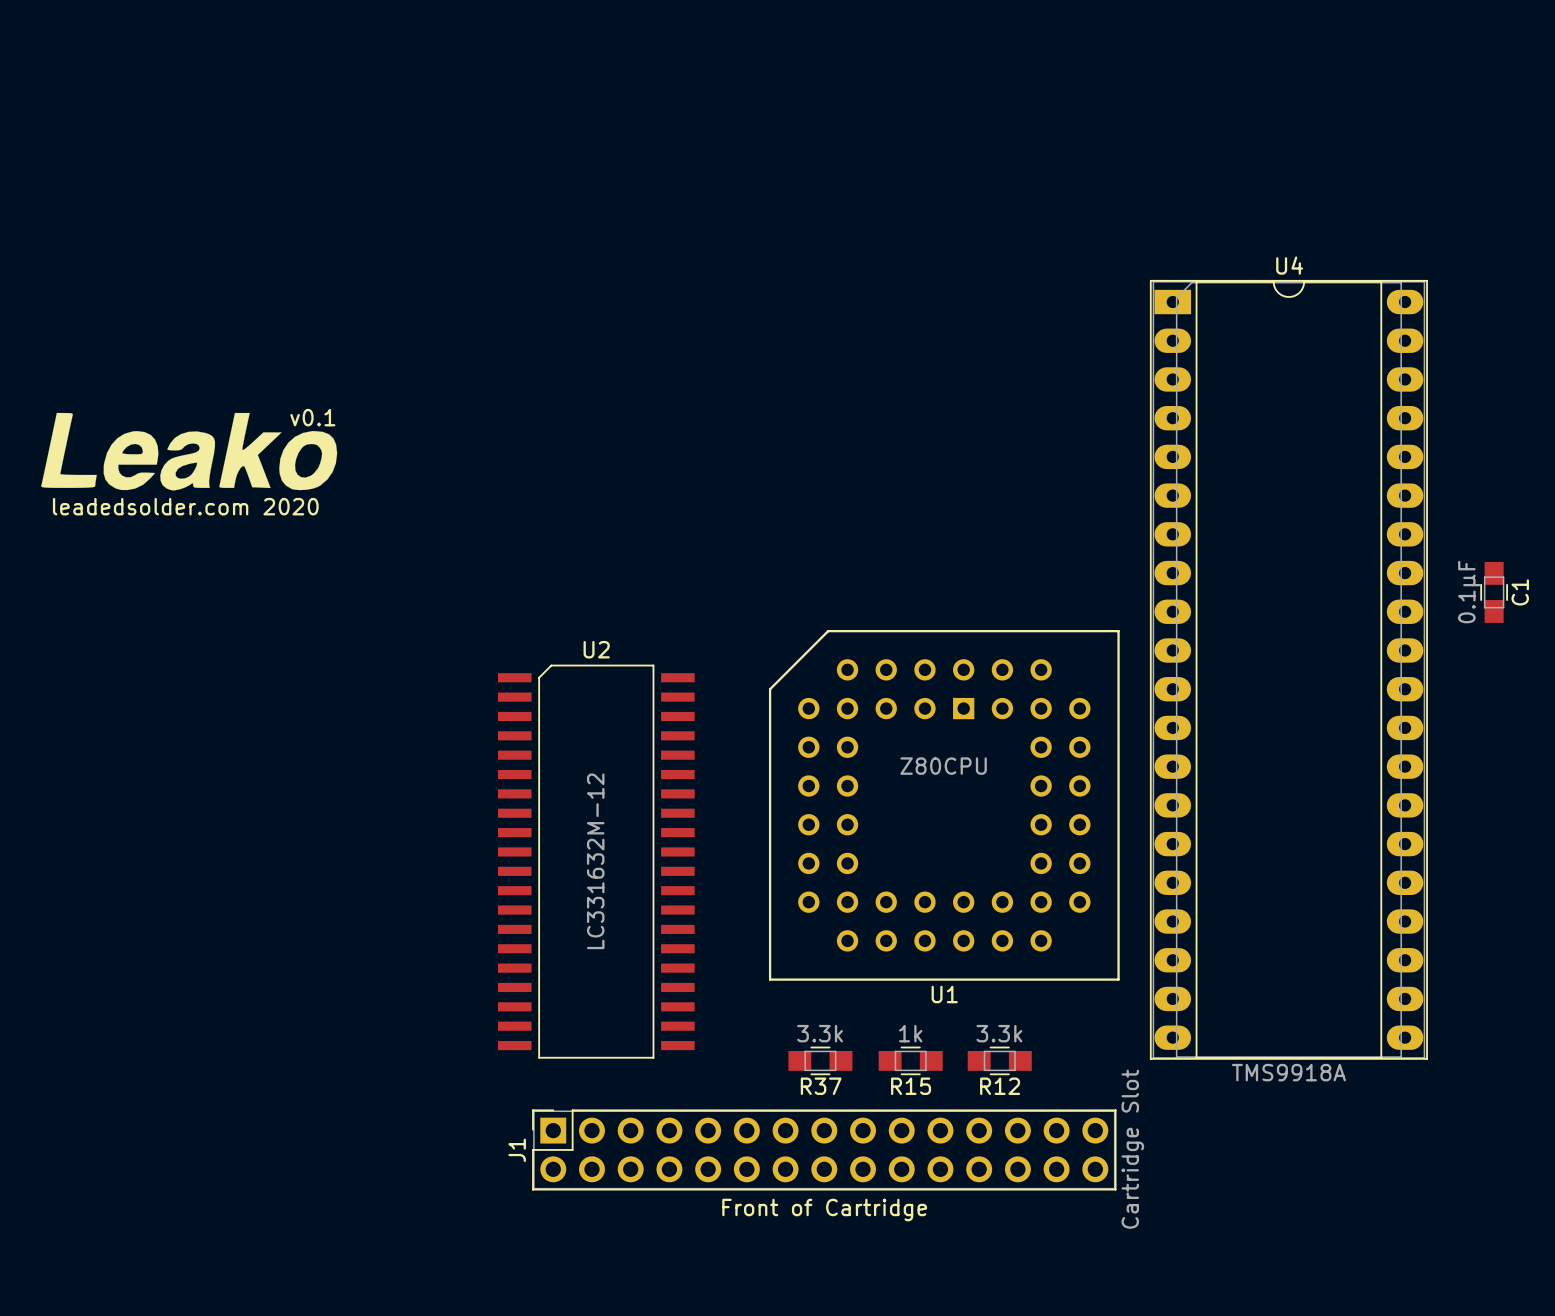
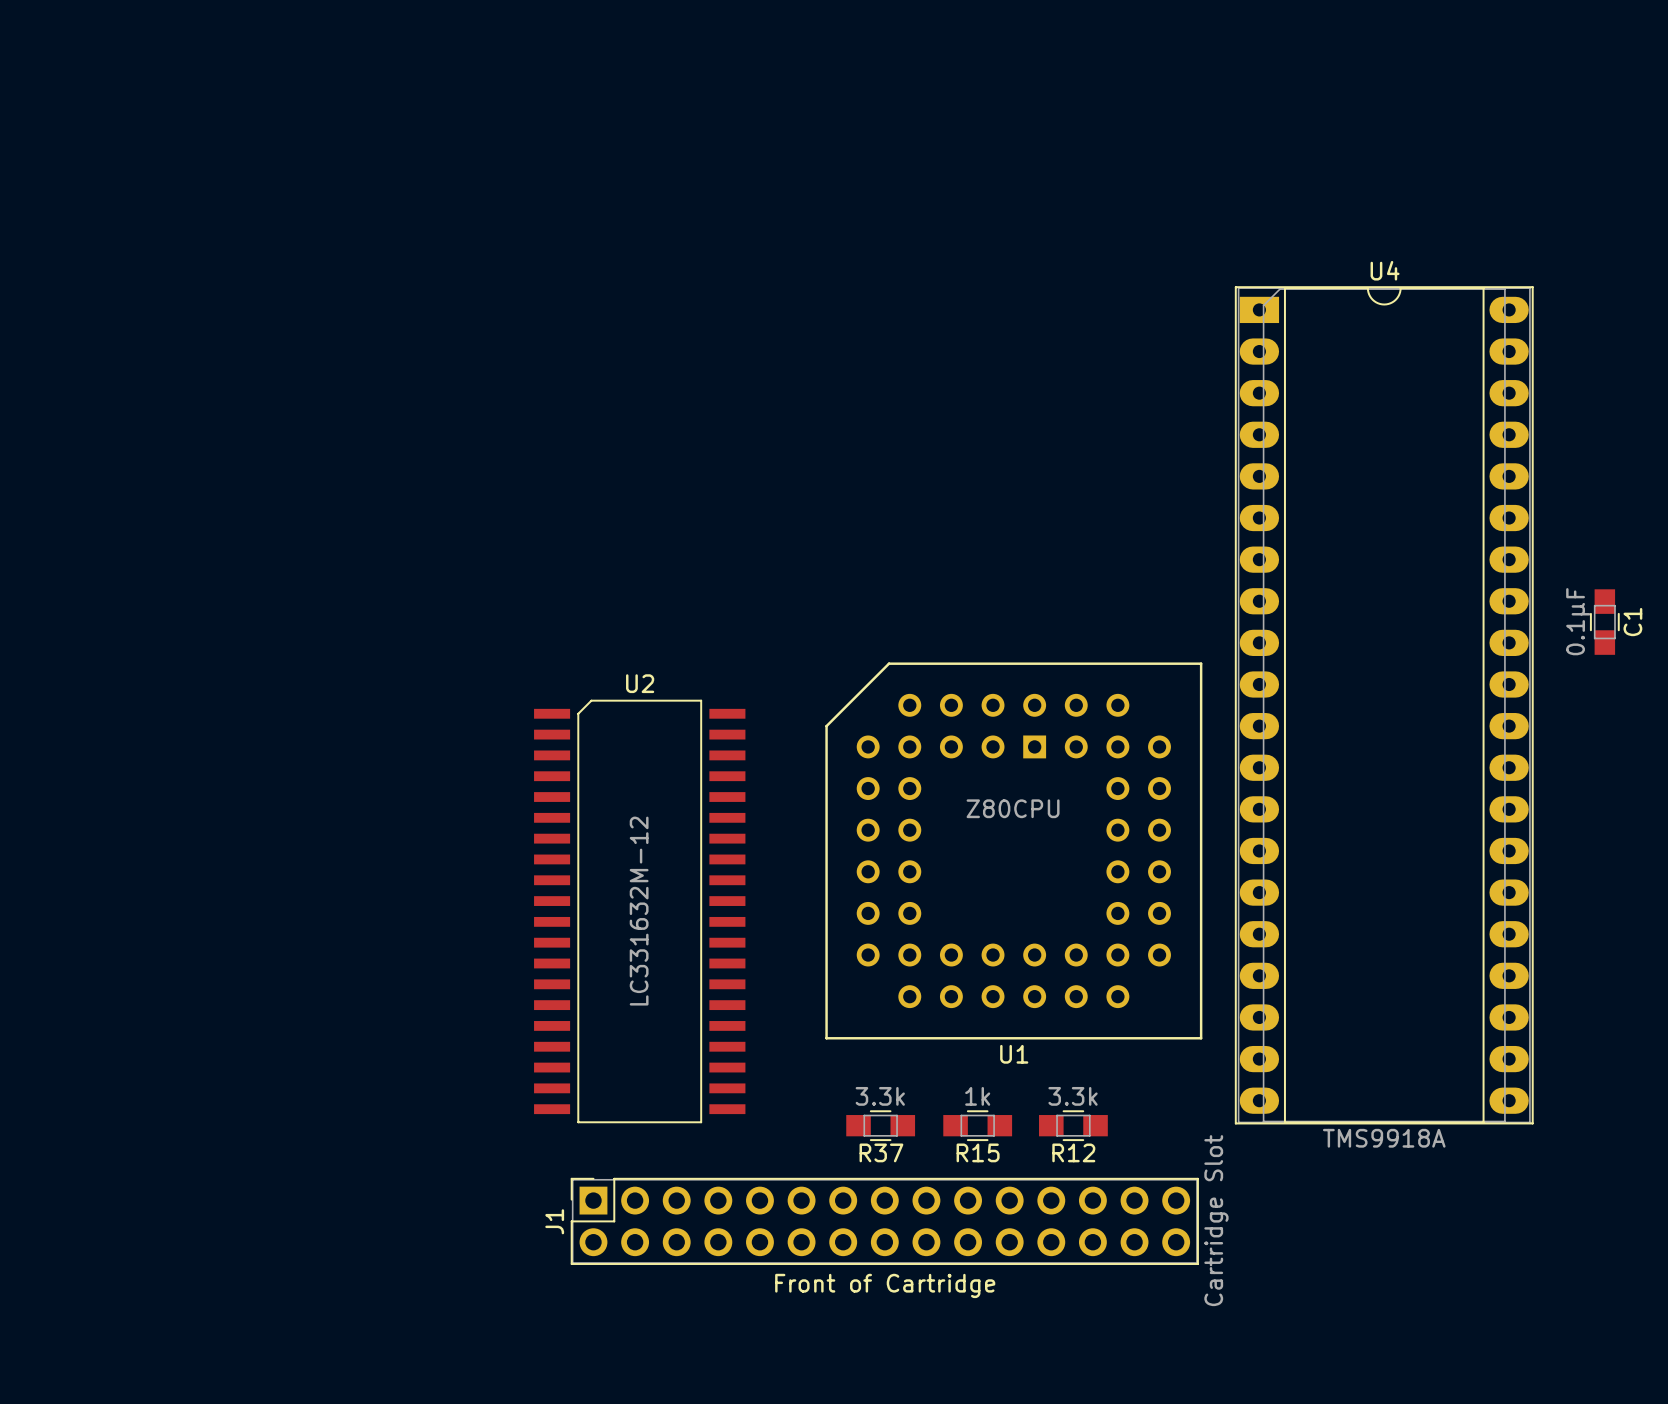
drawing: [41, 412, 338, 491] -> none
text: v0.1 (312, 417) -> none
text: leadedsolder.com 2020 (185, 506) -> none

